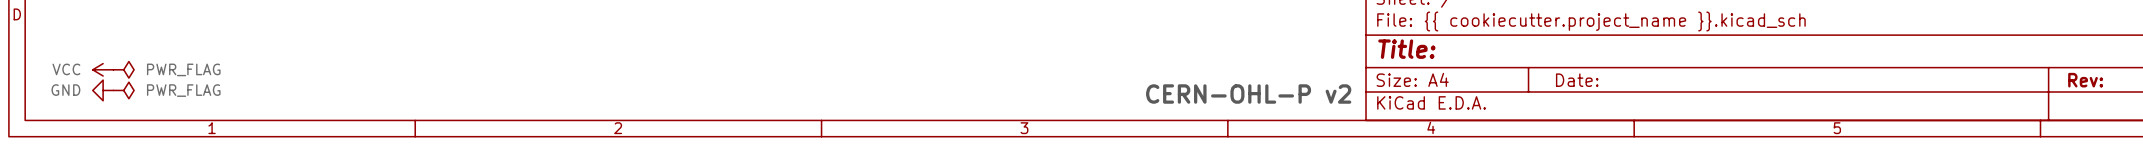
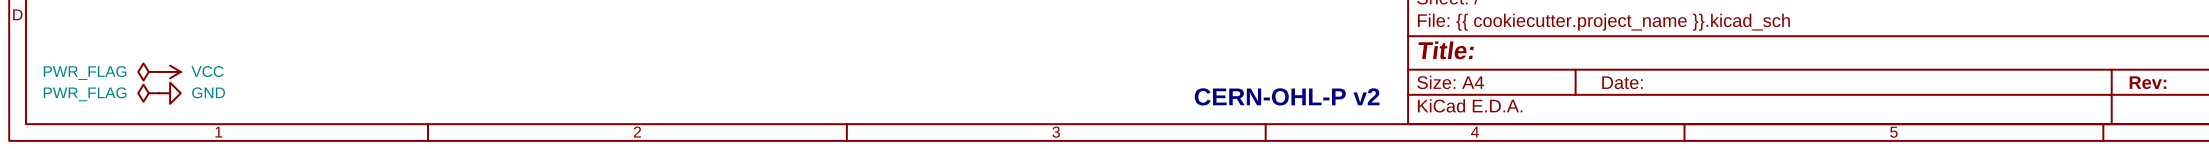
power symbol rotation: 0° (103, 69) -> 180° (170, 71)
power symbol position: VCC (103, 69) -> VCC (170, 71)
power symbol: PWR_FLAG (123, 69) -> none
power symbol: none -> PWR_FLAG (148, 71)
power symbol rotation: 0° (103, 90) -> 180° (170, 93)
power symbol position: GND (103, 90) -> GND (170, 93)
power symbol: PWR_FLAG (123, 90) -> none
power symbol: none -> PWR_FLAG (148, 93)

